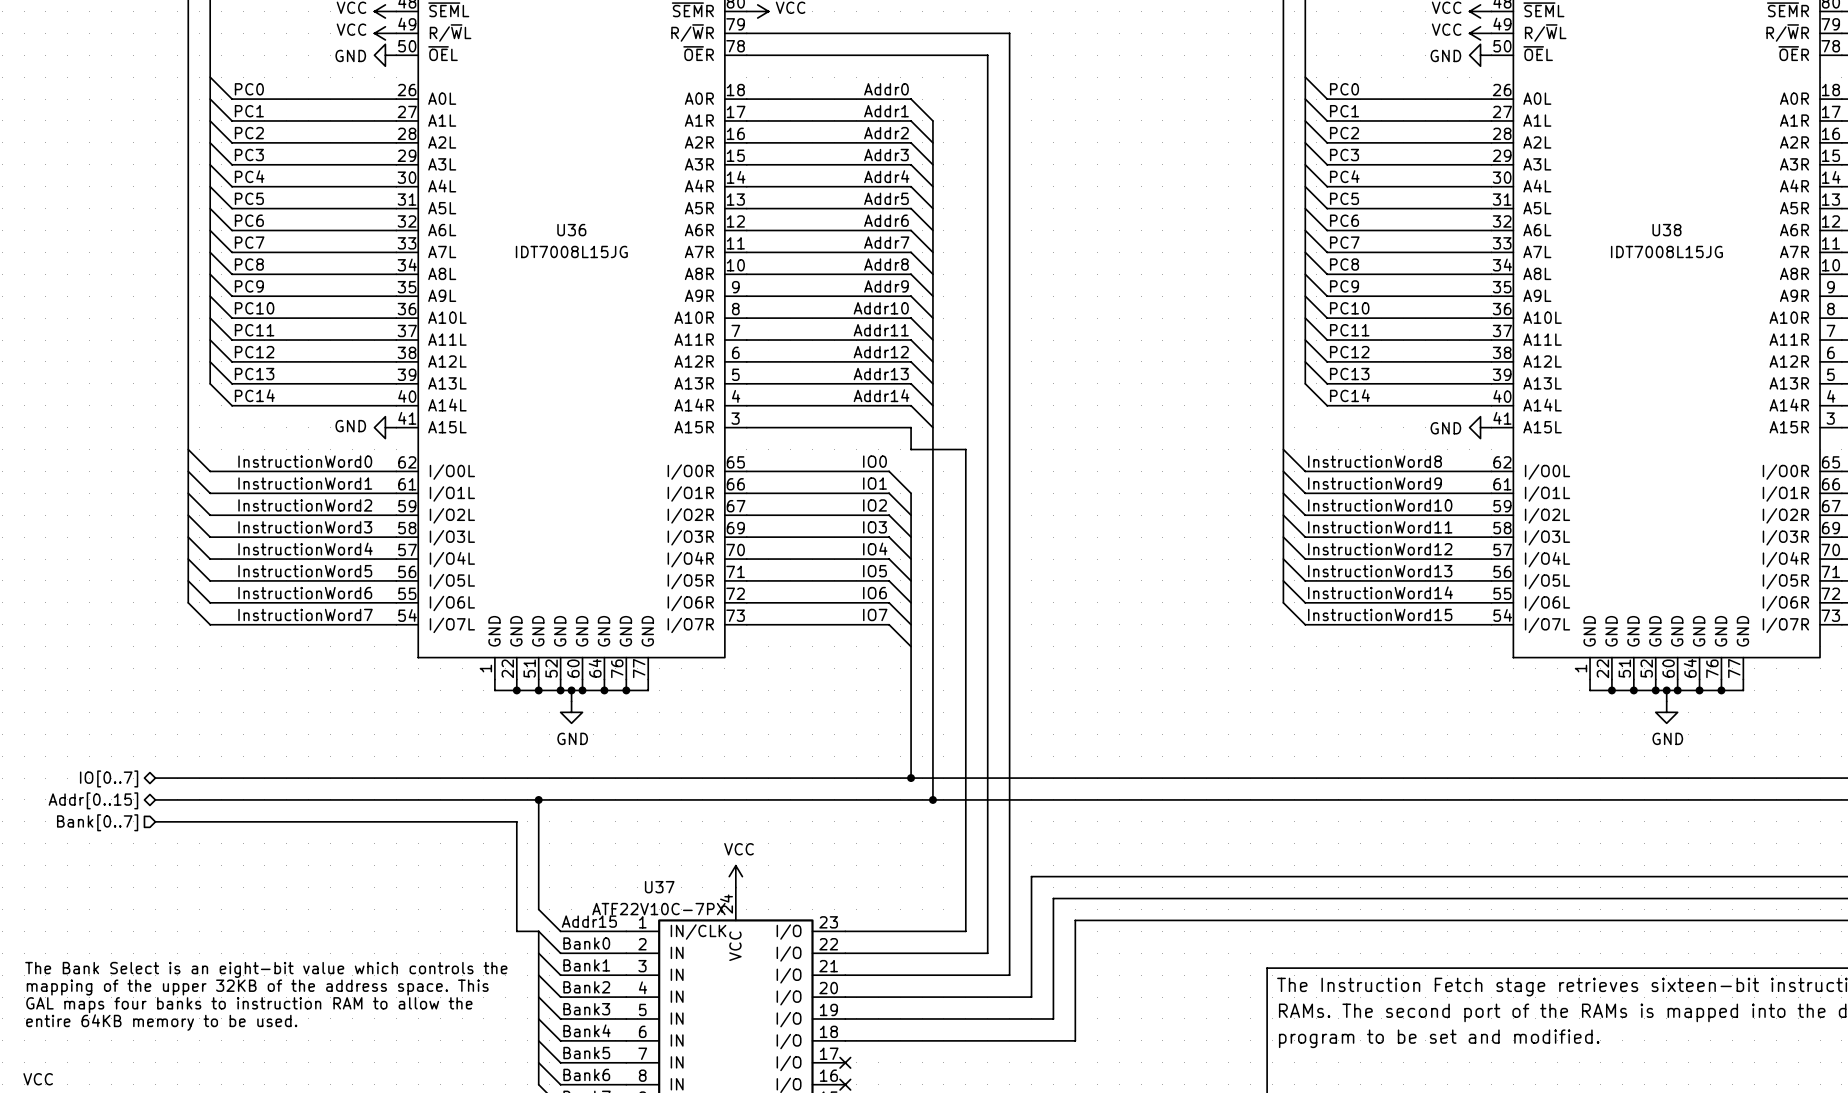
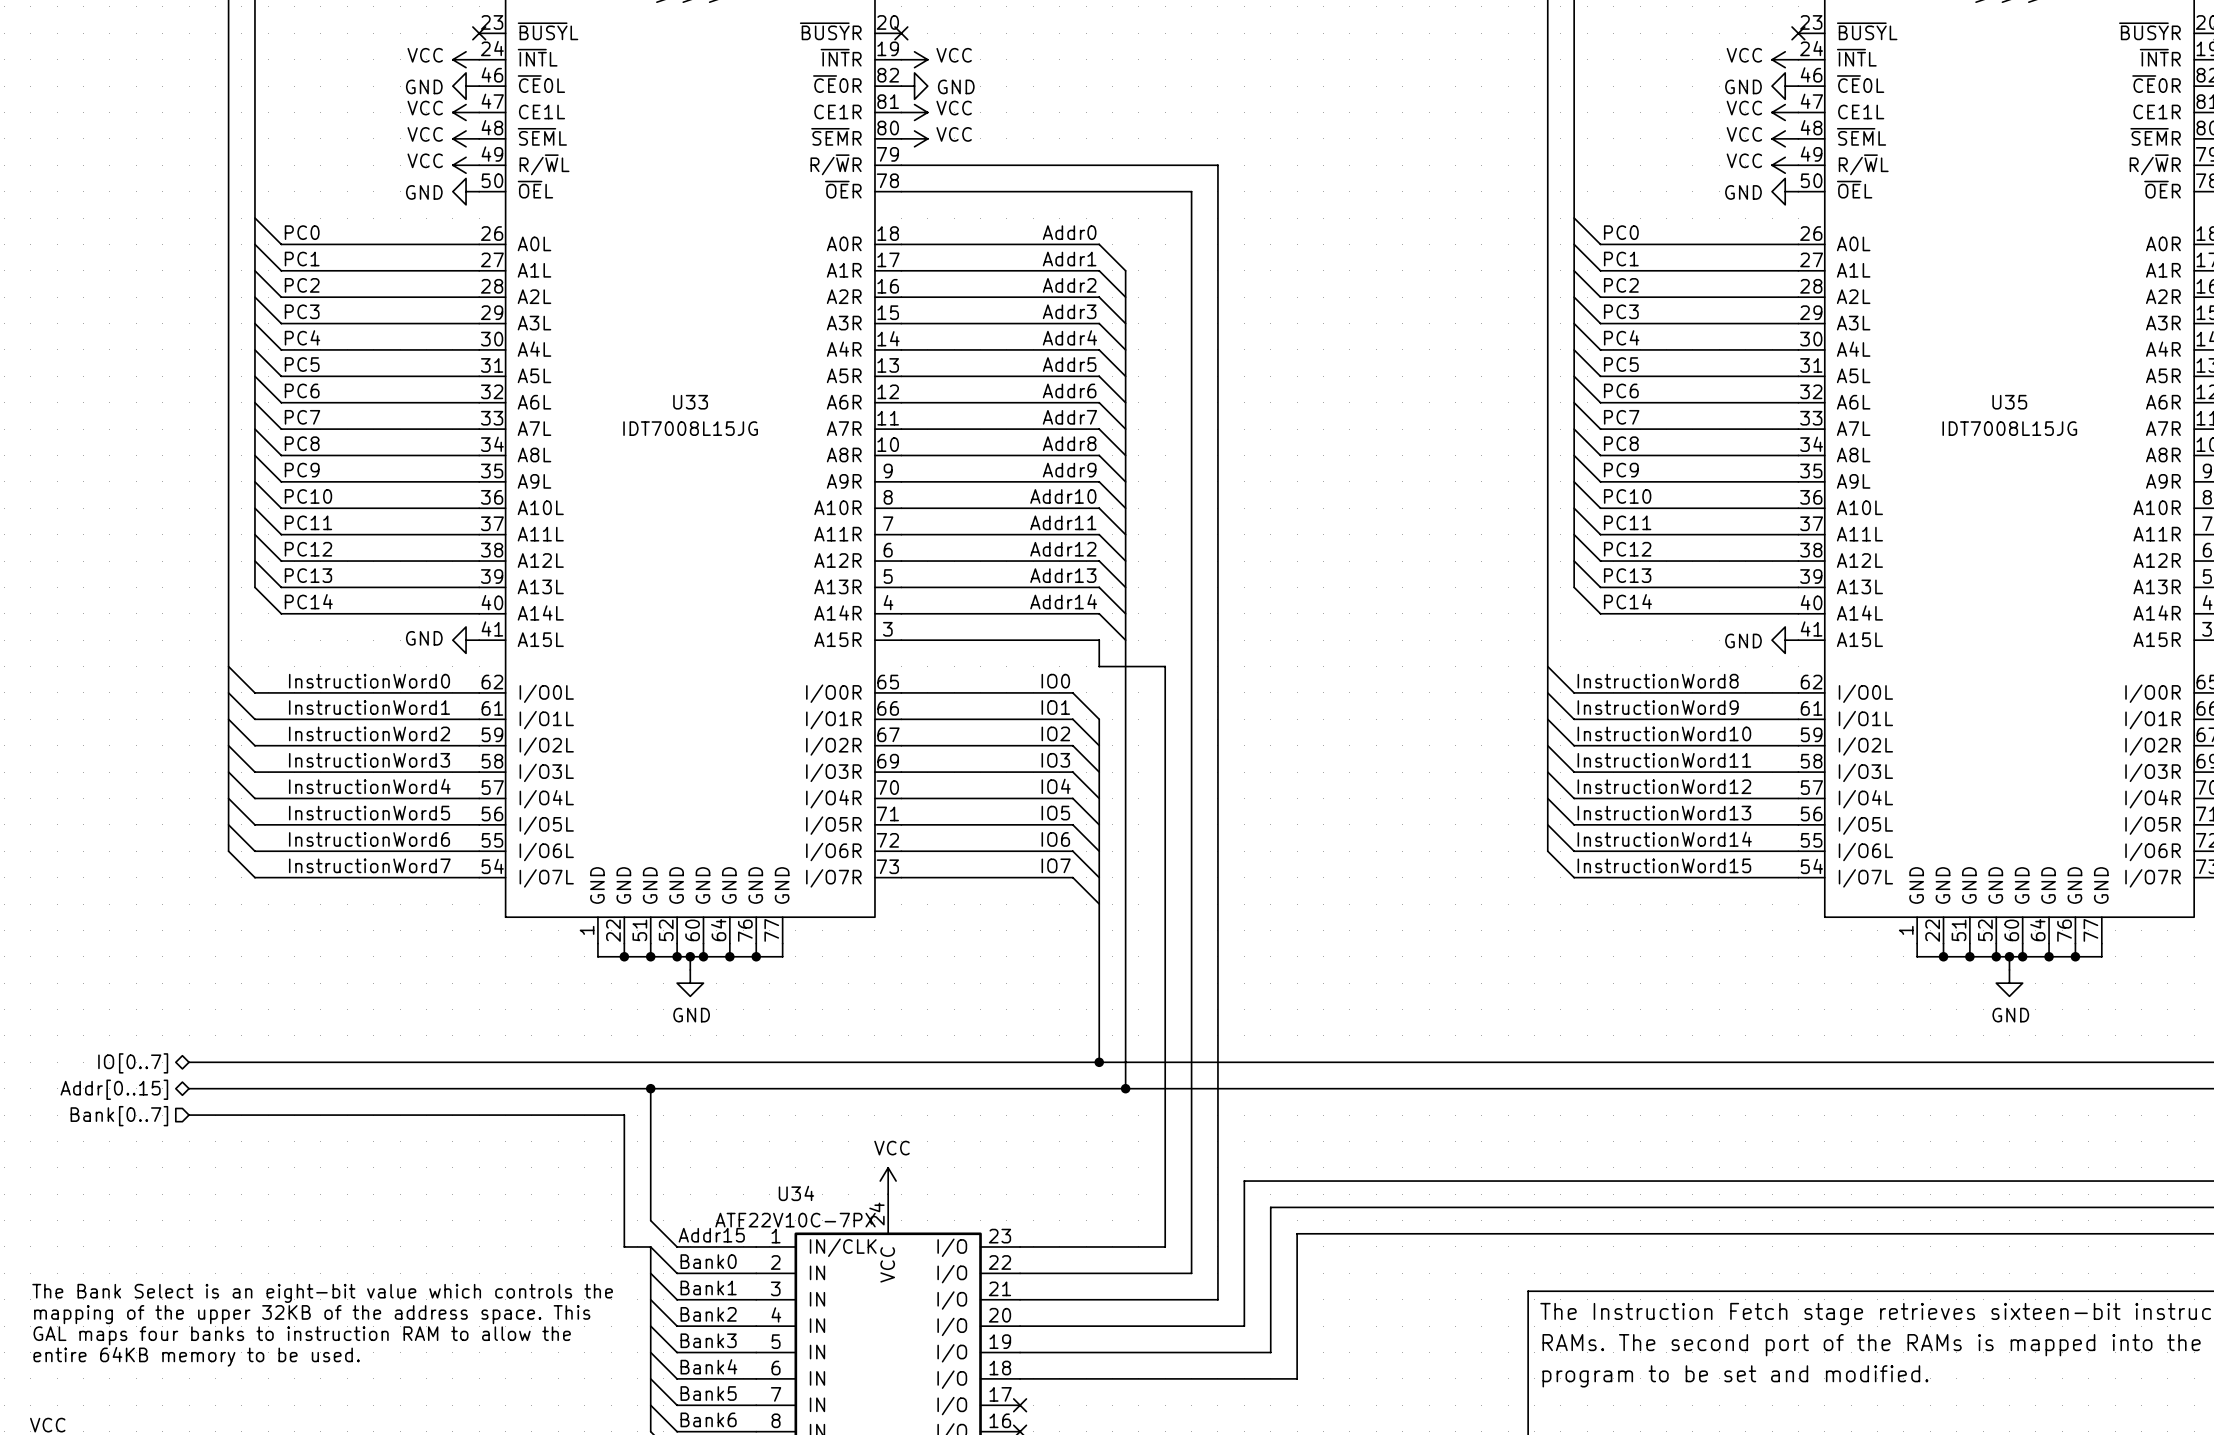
U36 name: U36 (571, 230) -> U33 (690, 402)
U38 name: U38 (1666, 230) -> U35 (2009, 402)
U37 name: U37 (659, 887) -> U34 (796, 1193)

